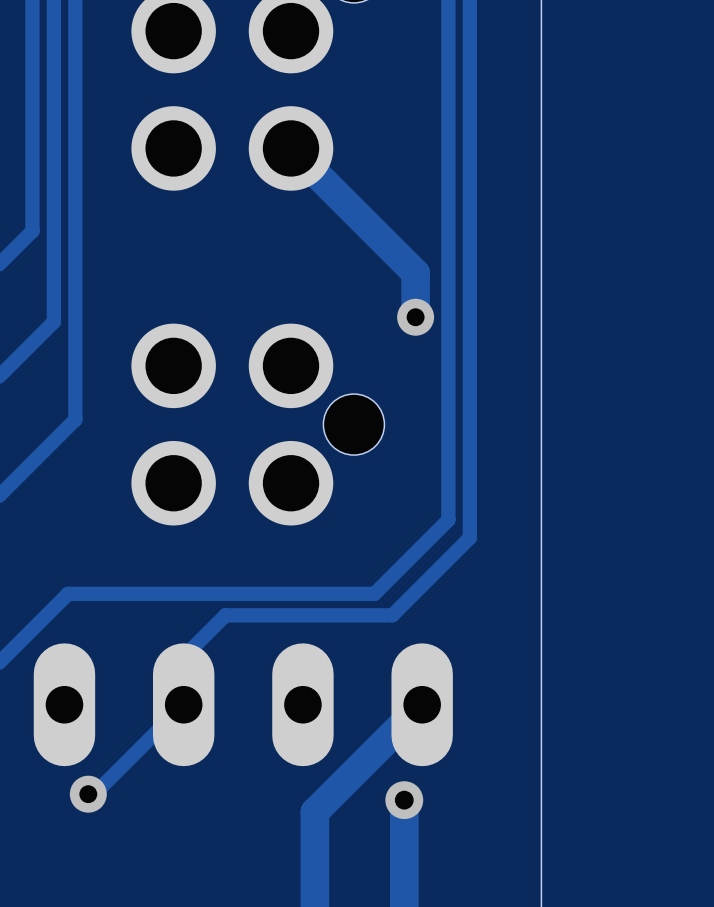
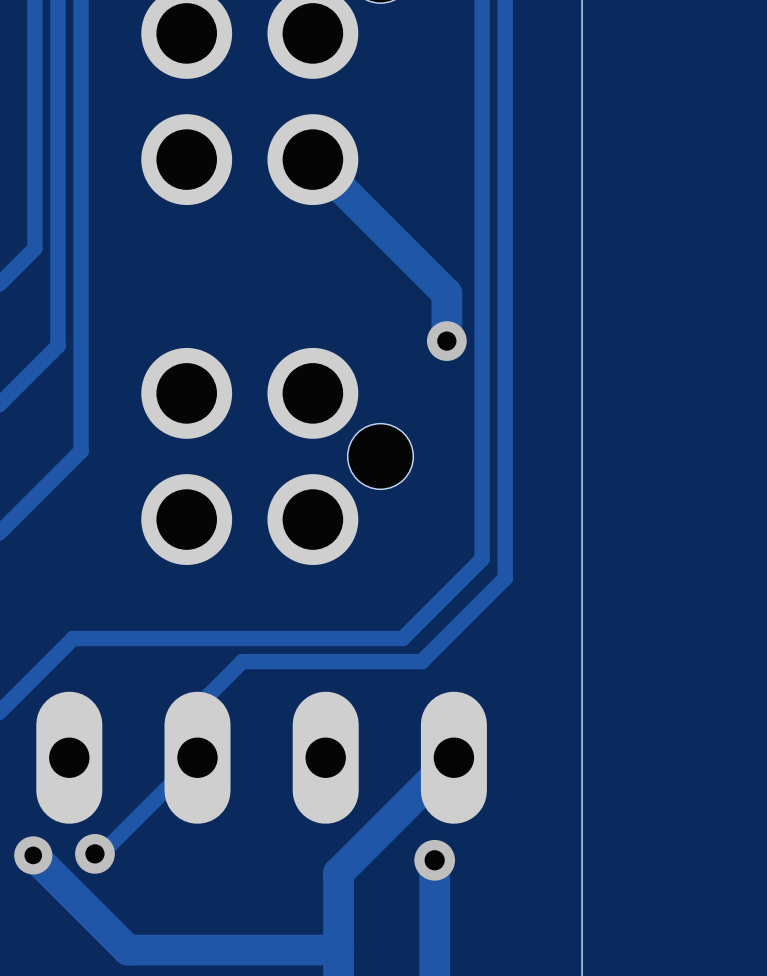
track: none -> (33, 855) (127, 950) (338, 950)
via: none -> (33, 855)

